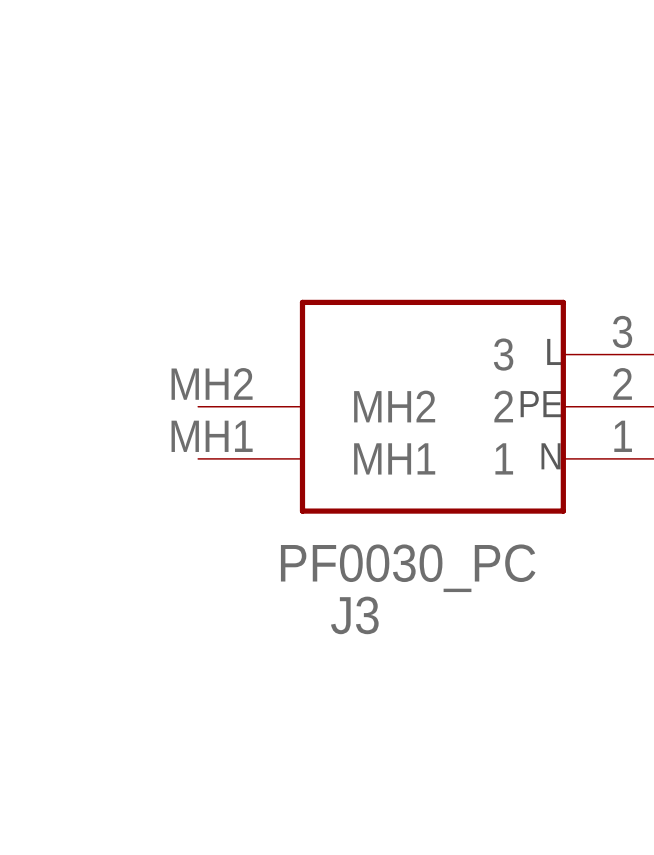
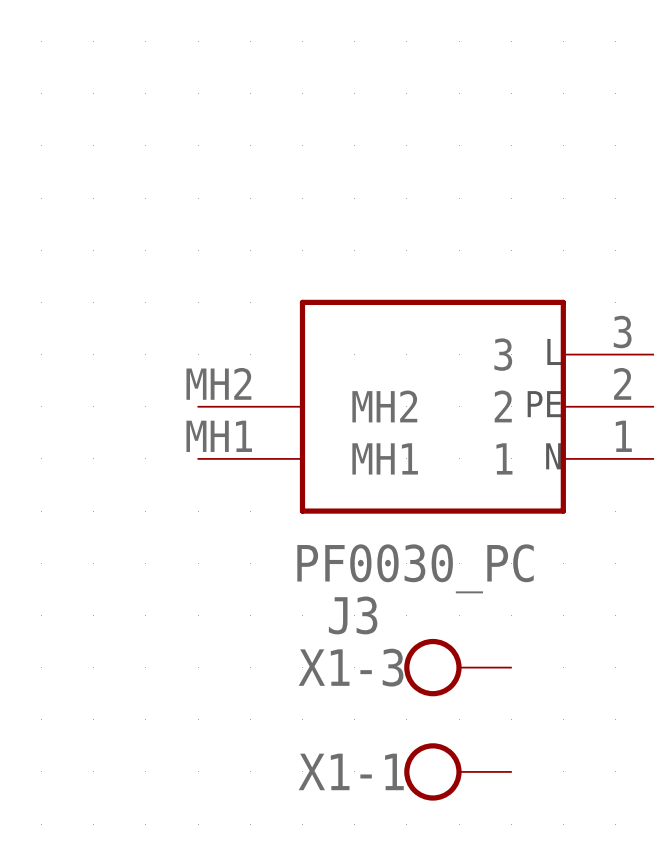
X1-3: none -> (457, 667)
X1-1: none -> (457, 771)

